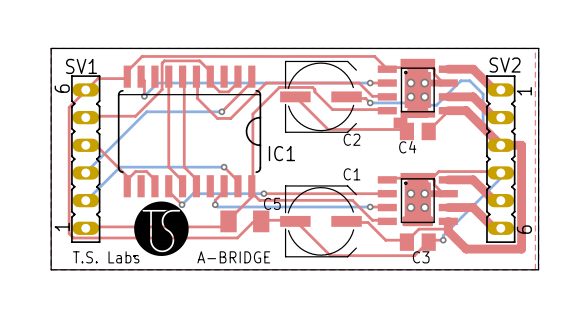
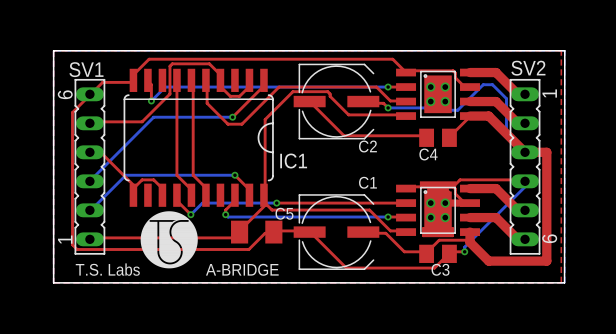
drawing: [400, 58, 443, 87] -> none
drawing: [393, 103, 436, 128] -> none

